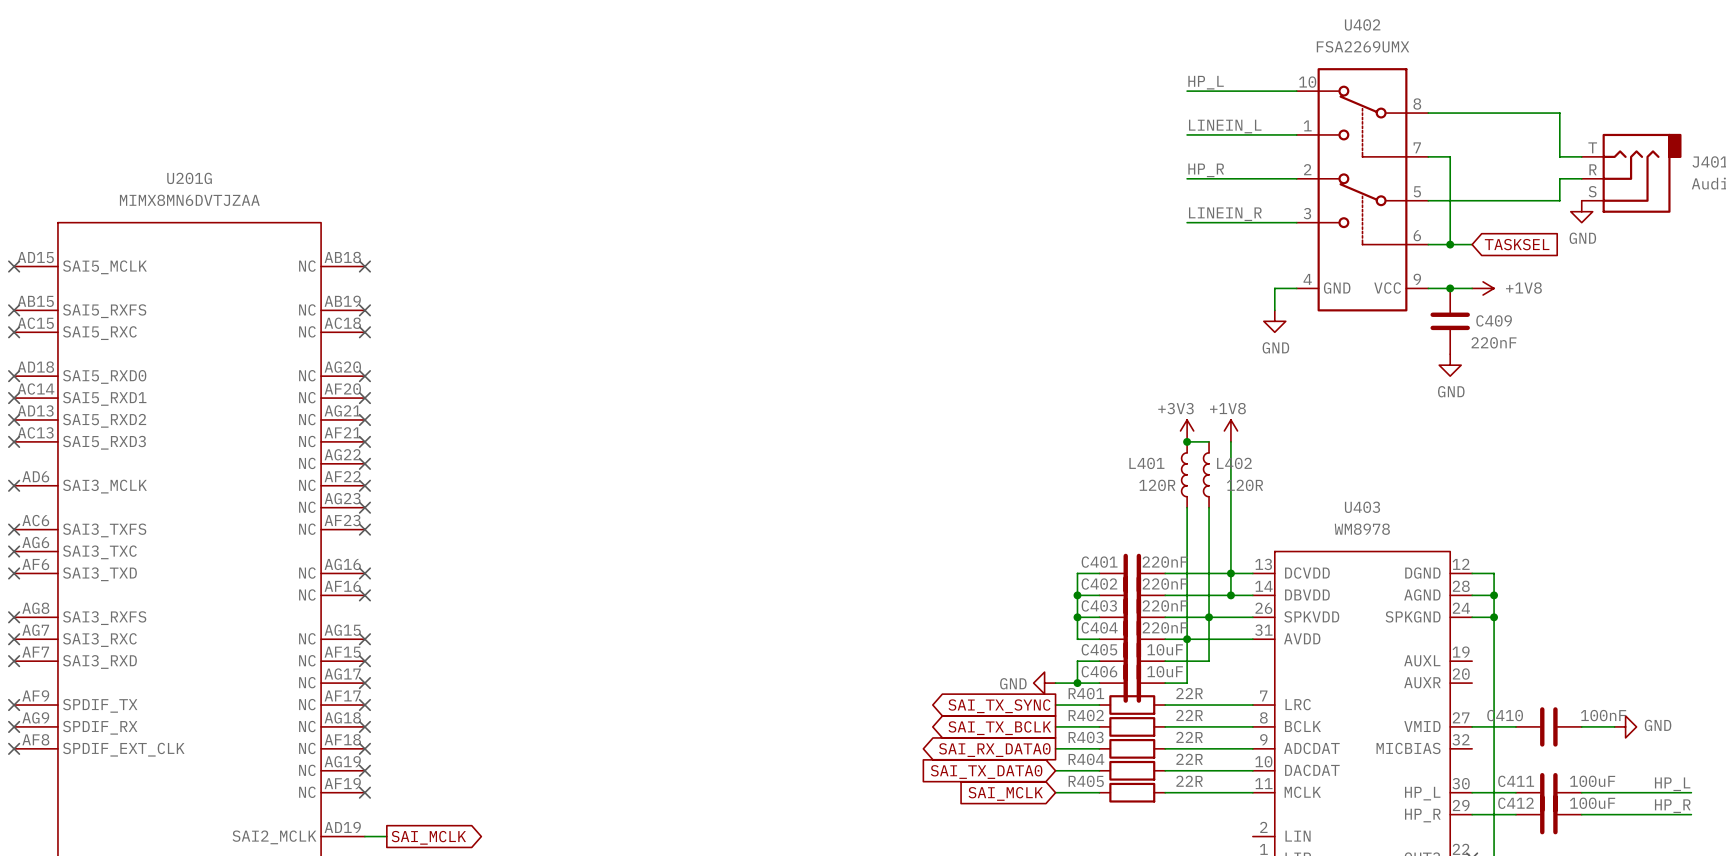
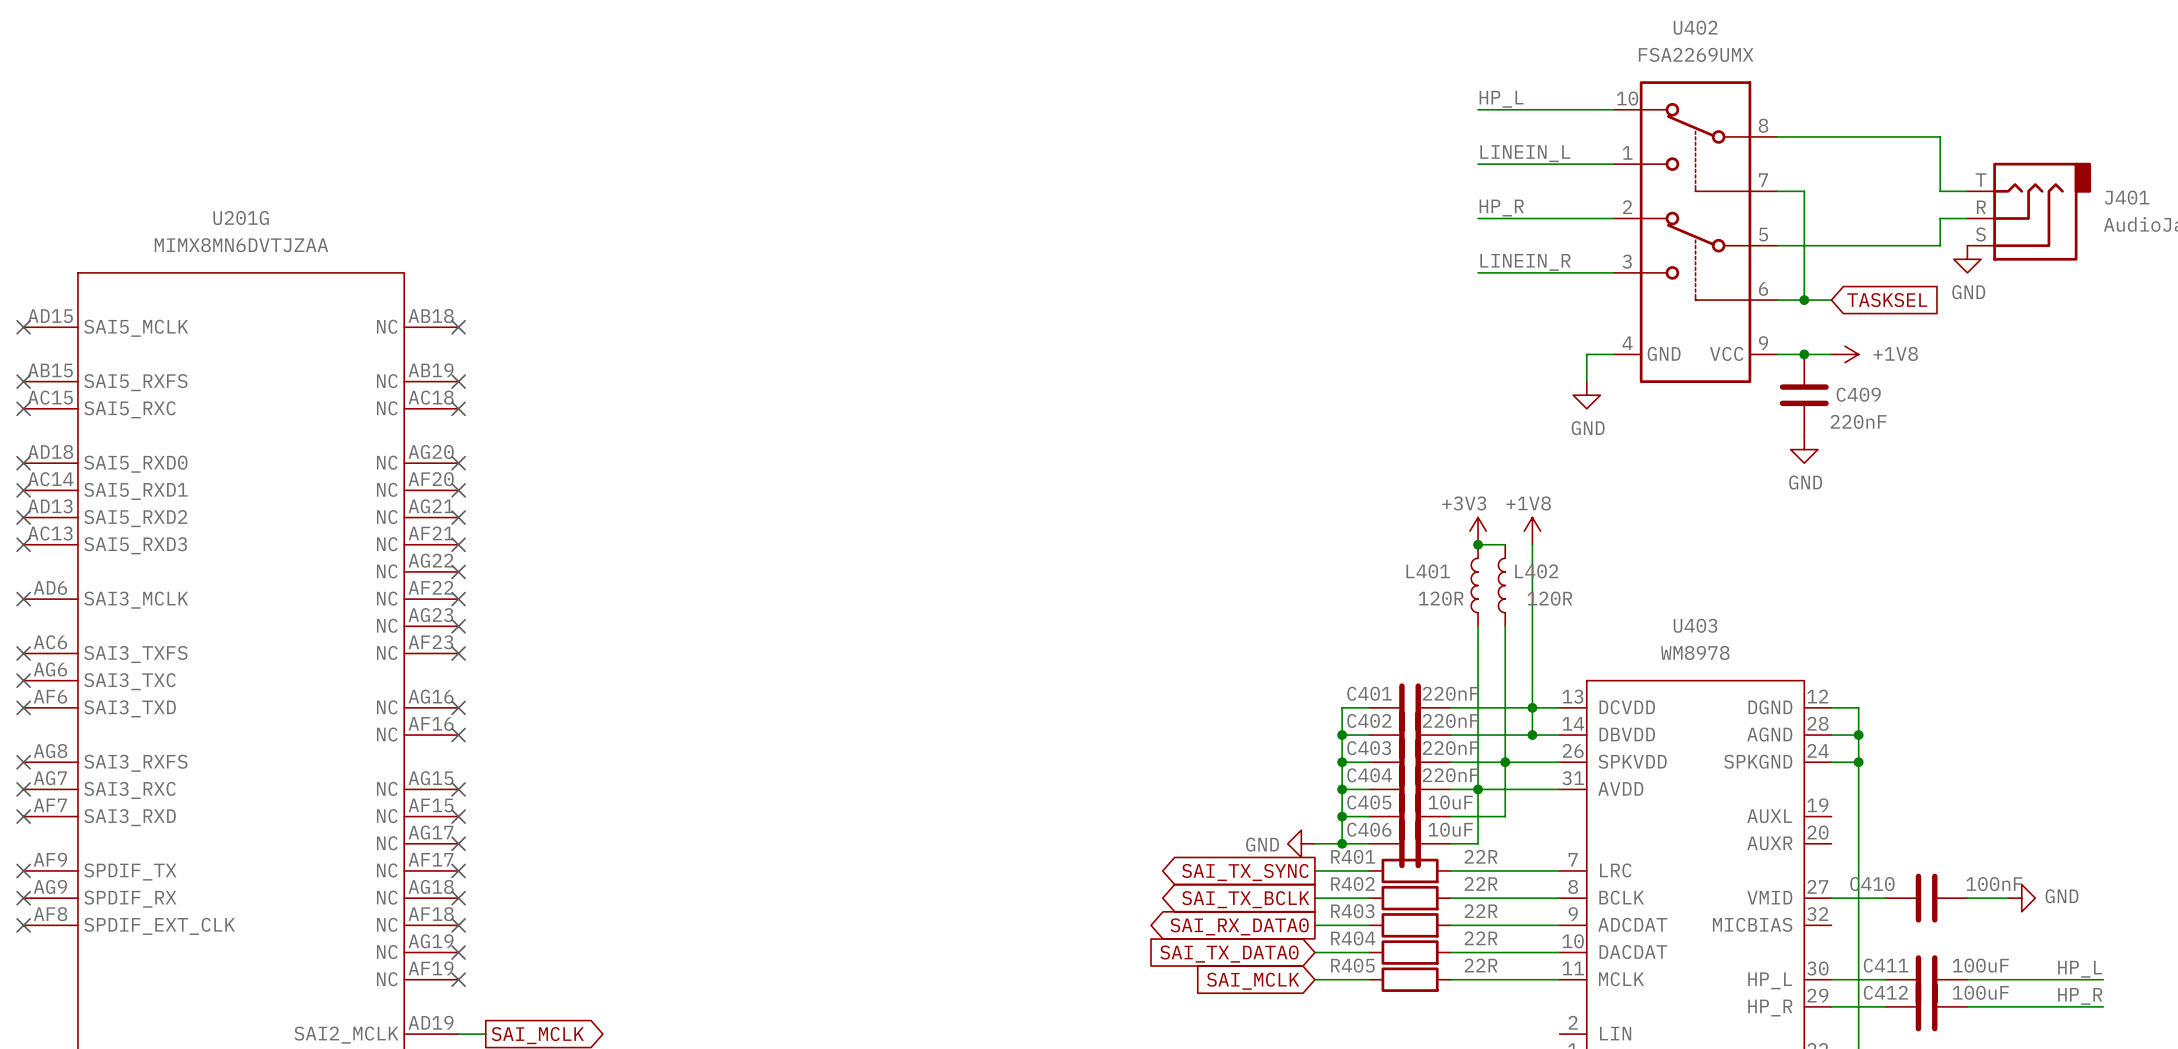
wire: none -> (1342, 789) (1342, 816)
junction: none -> (1342, 789)
junction: none -> (1342, 816)

